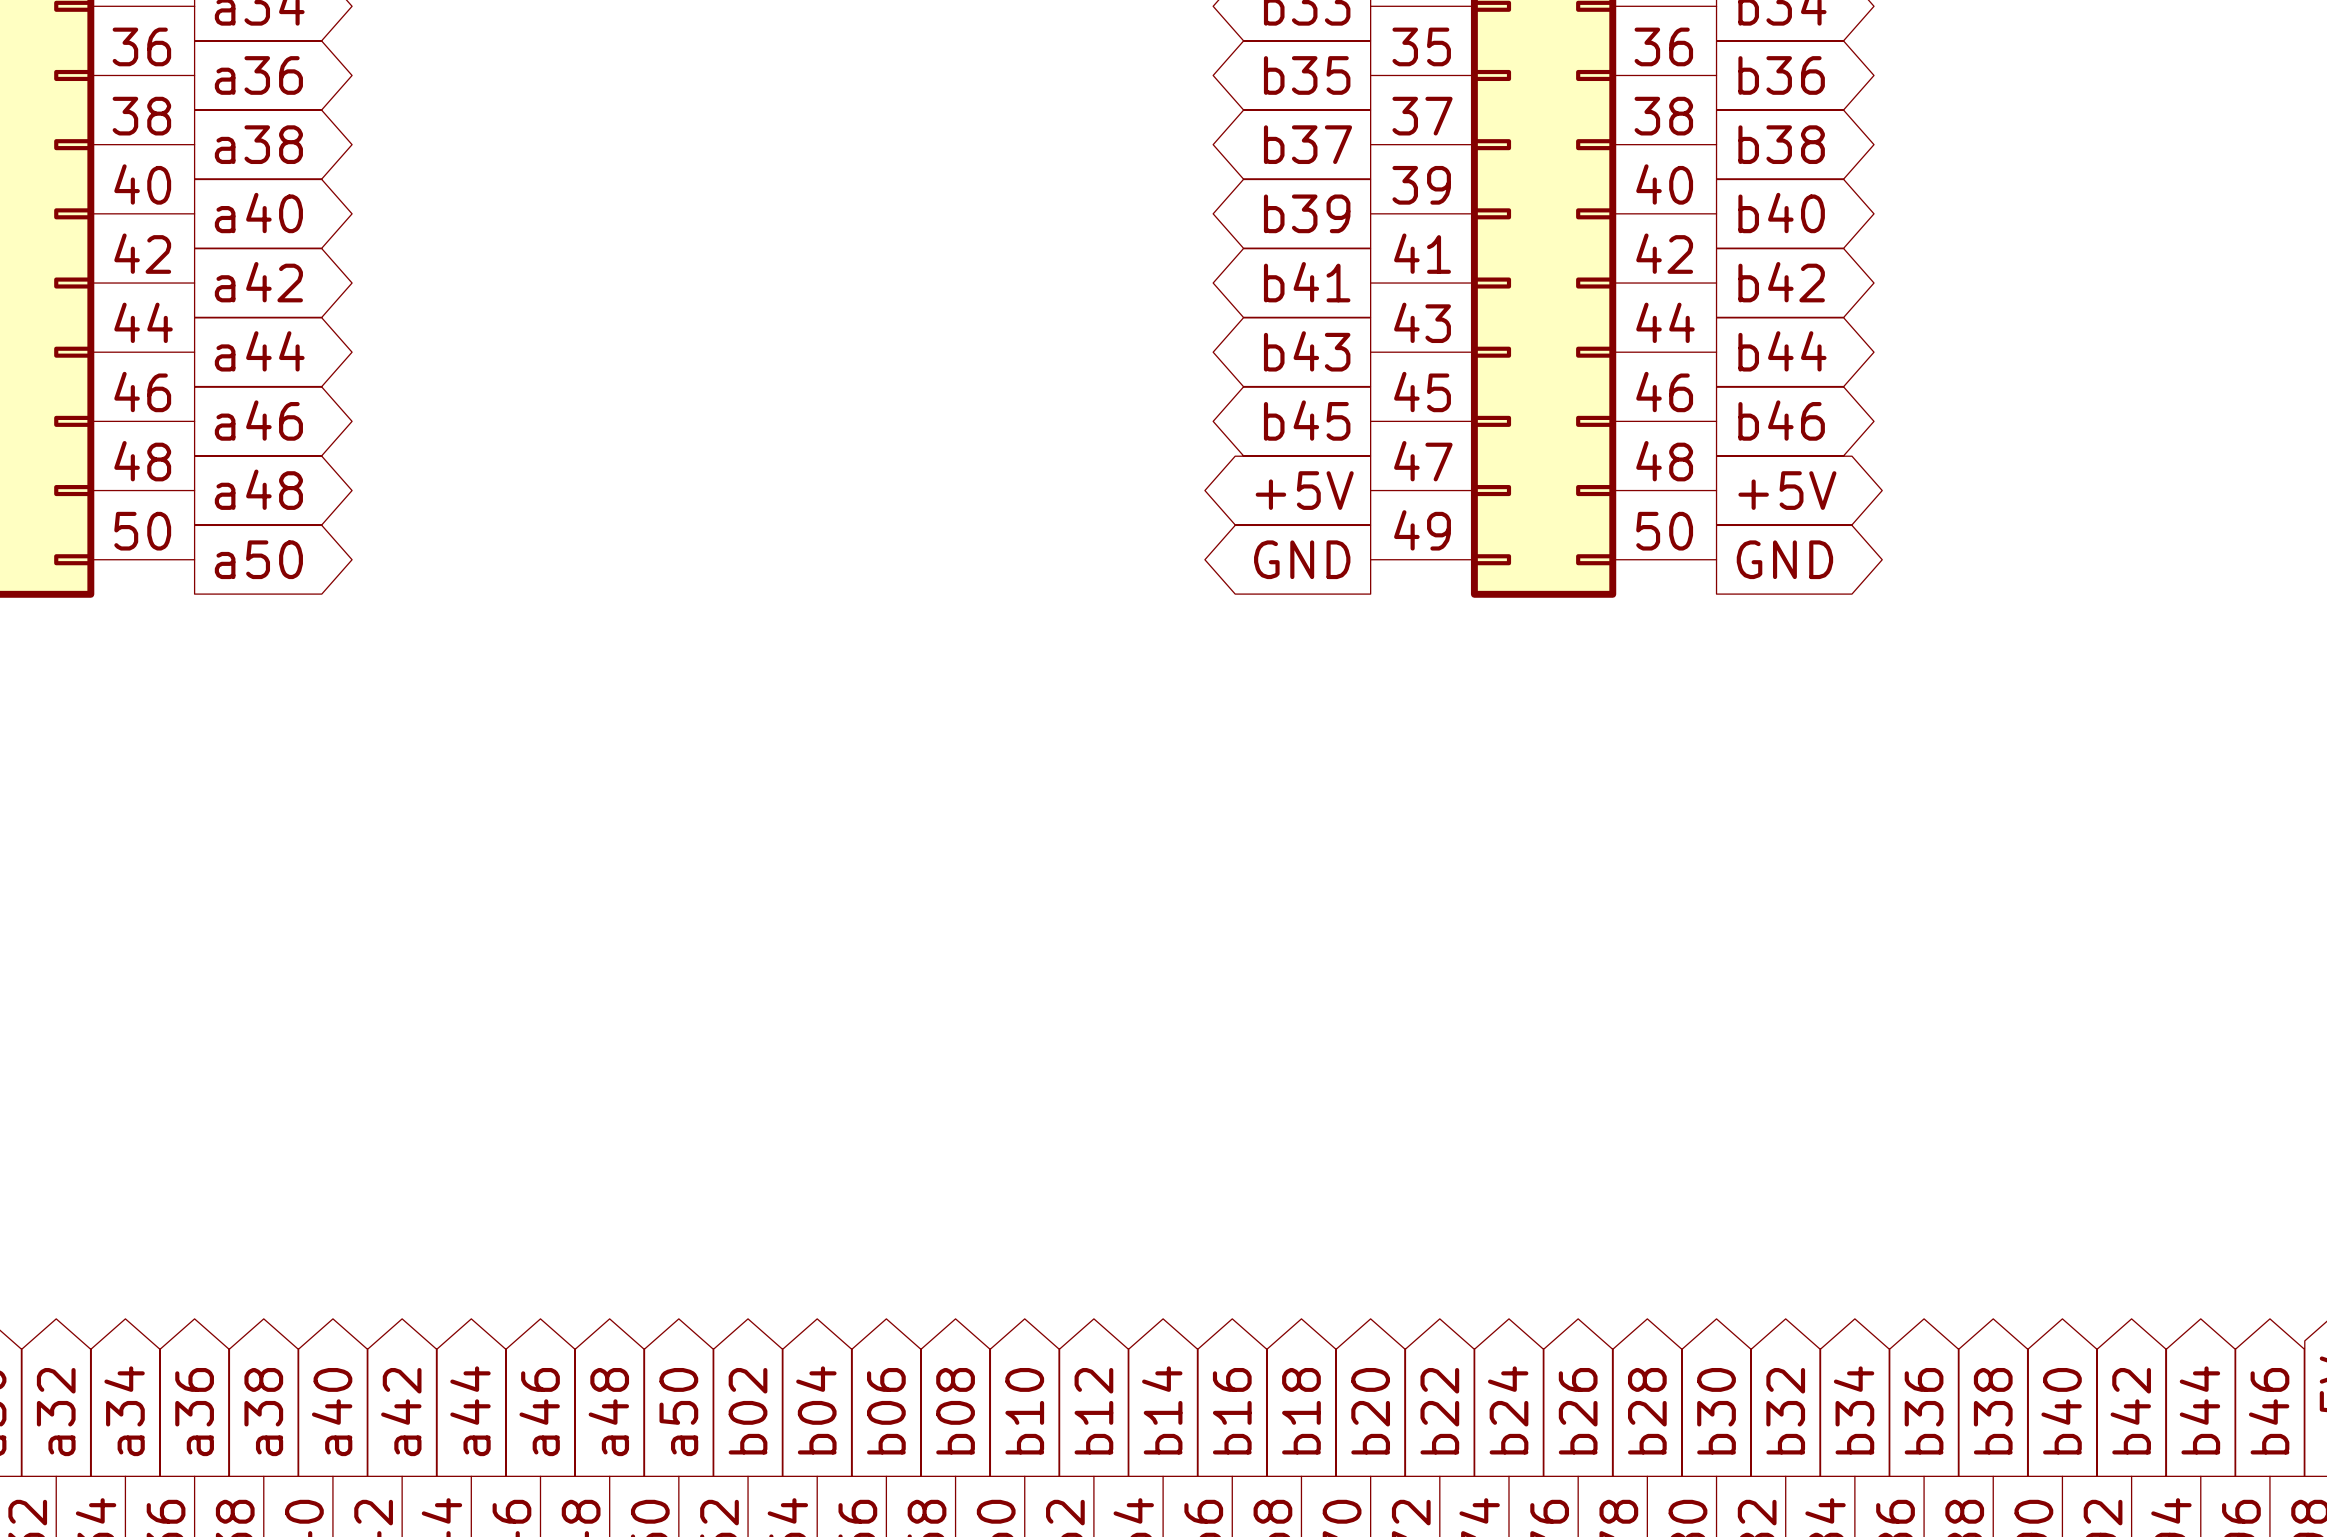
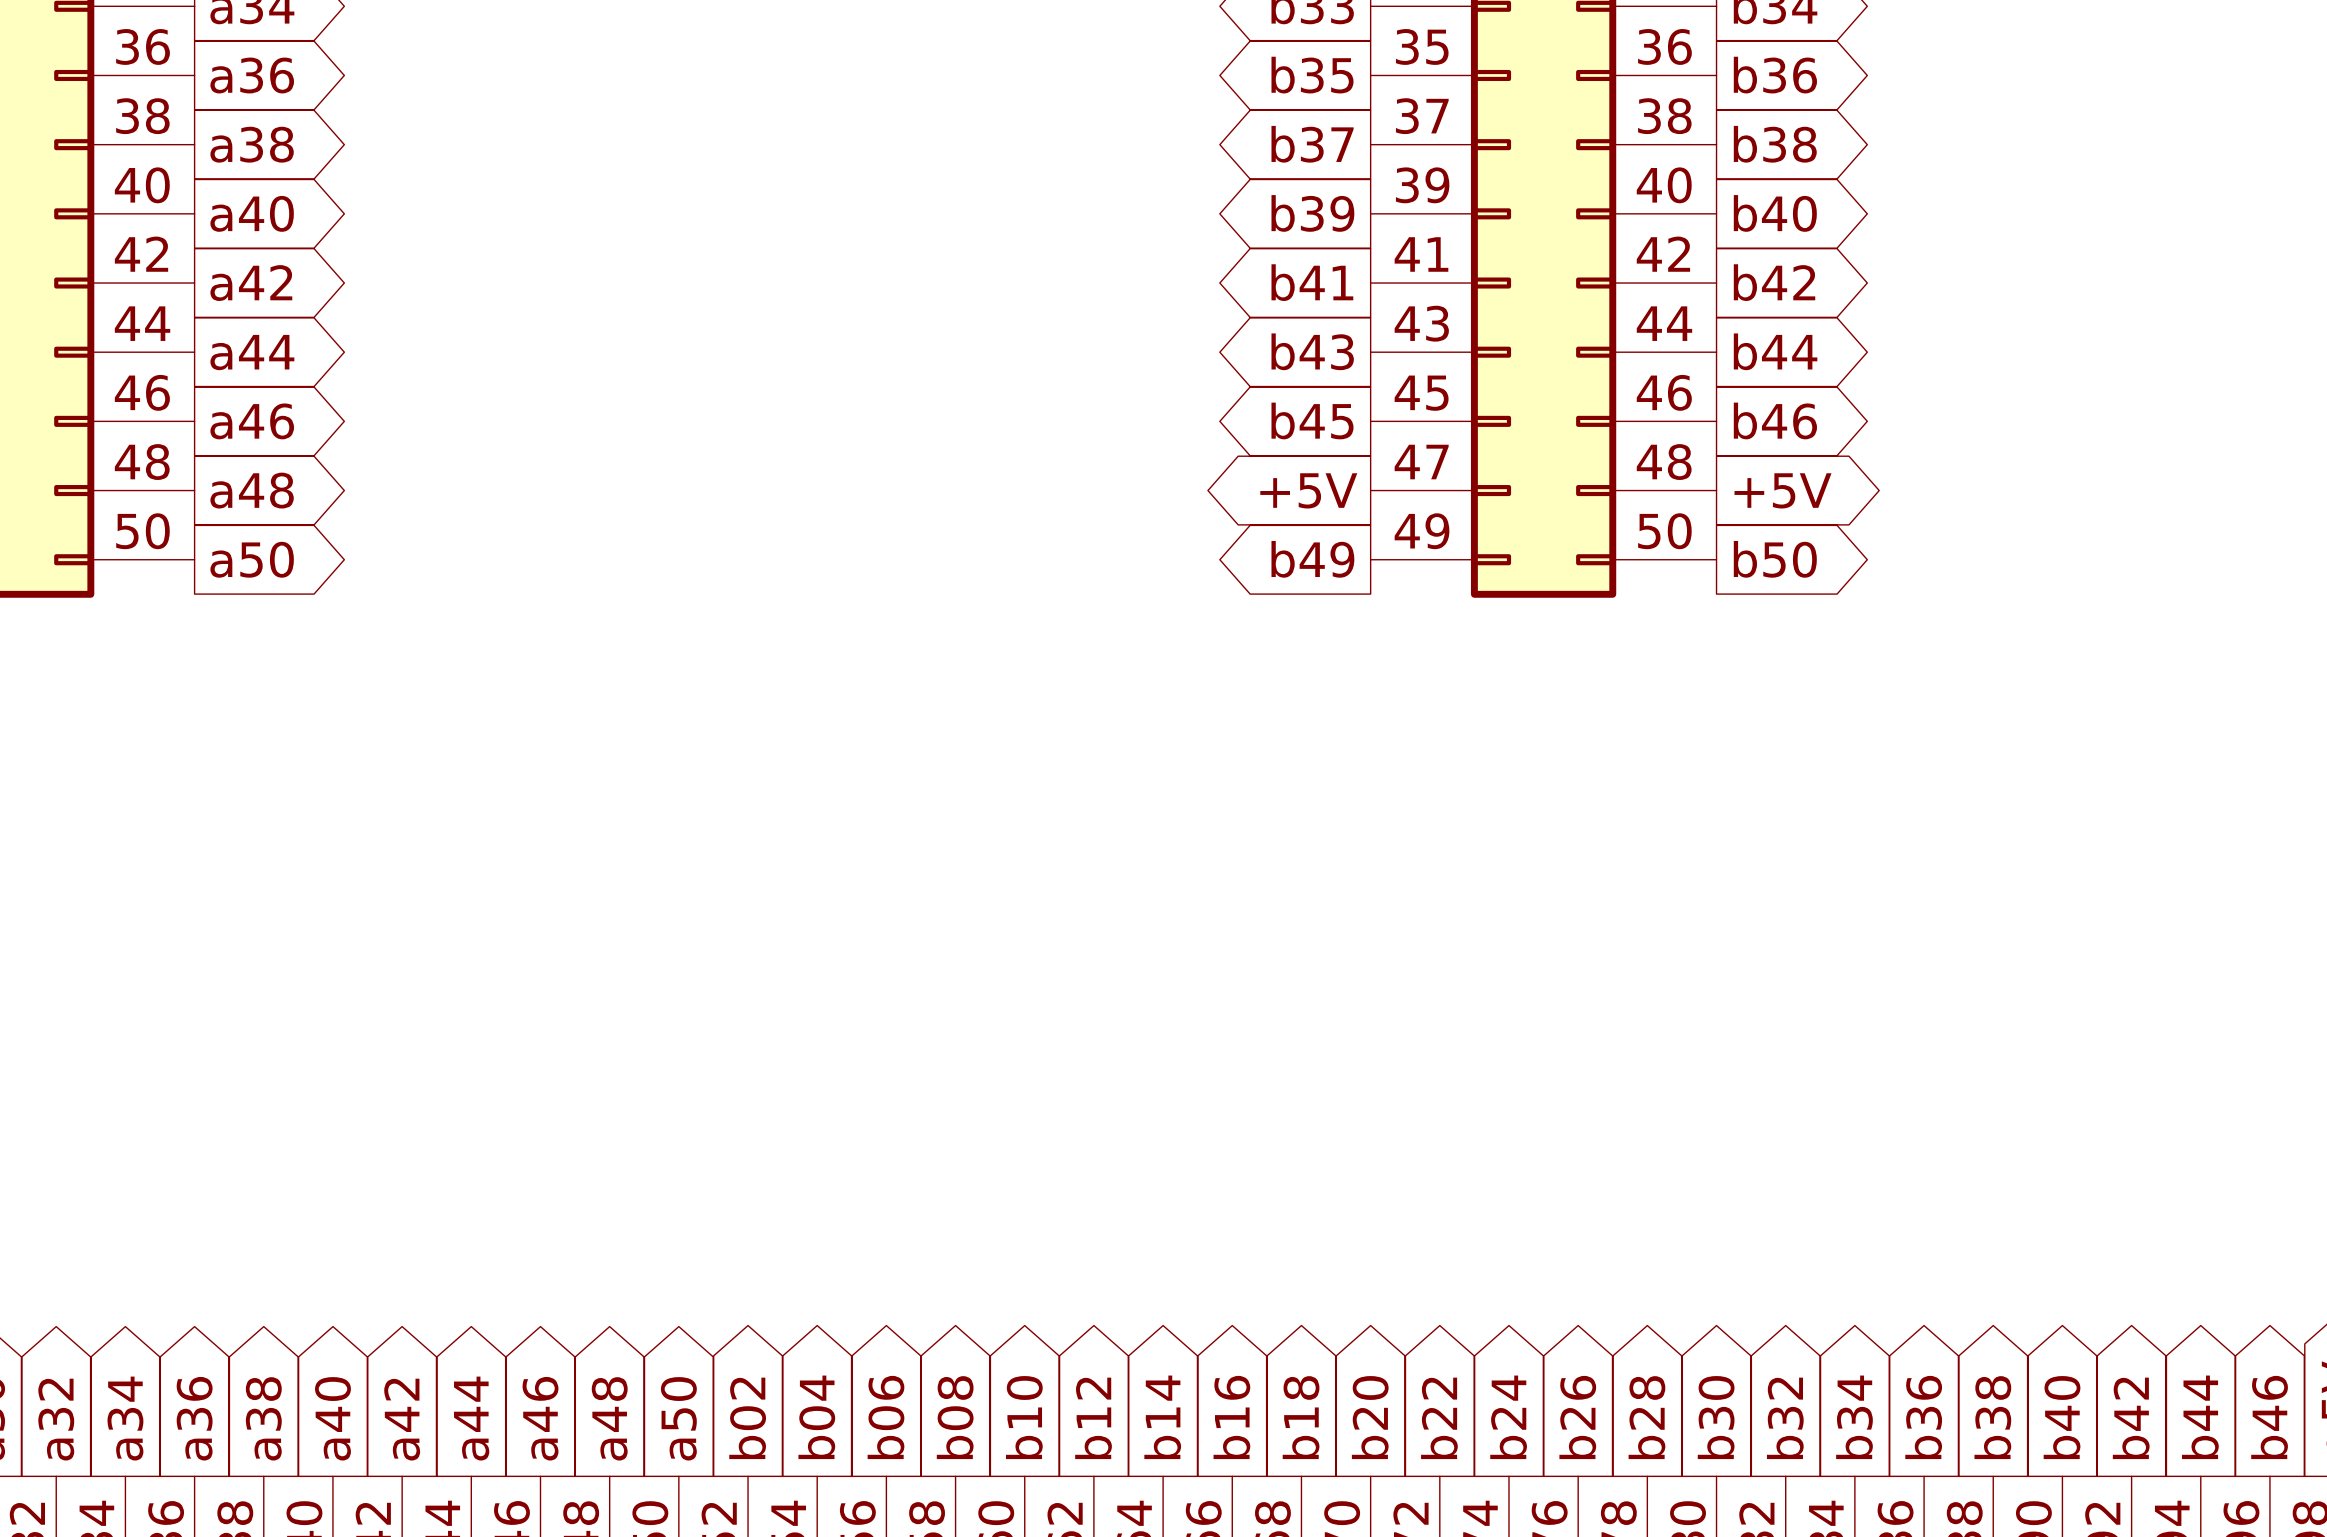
global label: GND (1302, 559) -> b49 (1312, 559)
global label: GND (1784, 559) -> b50 (1775, 559)

